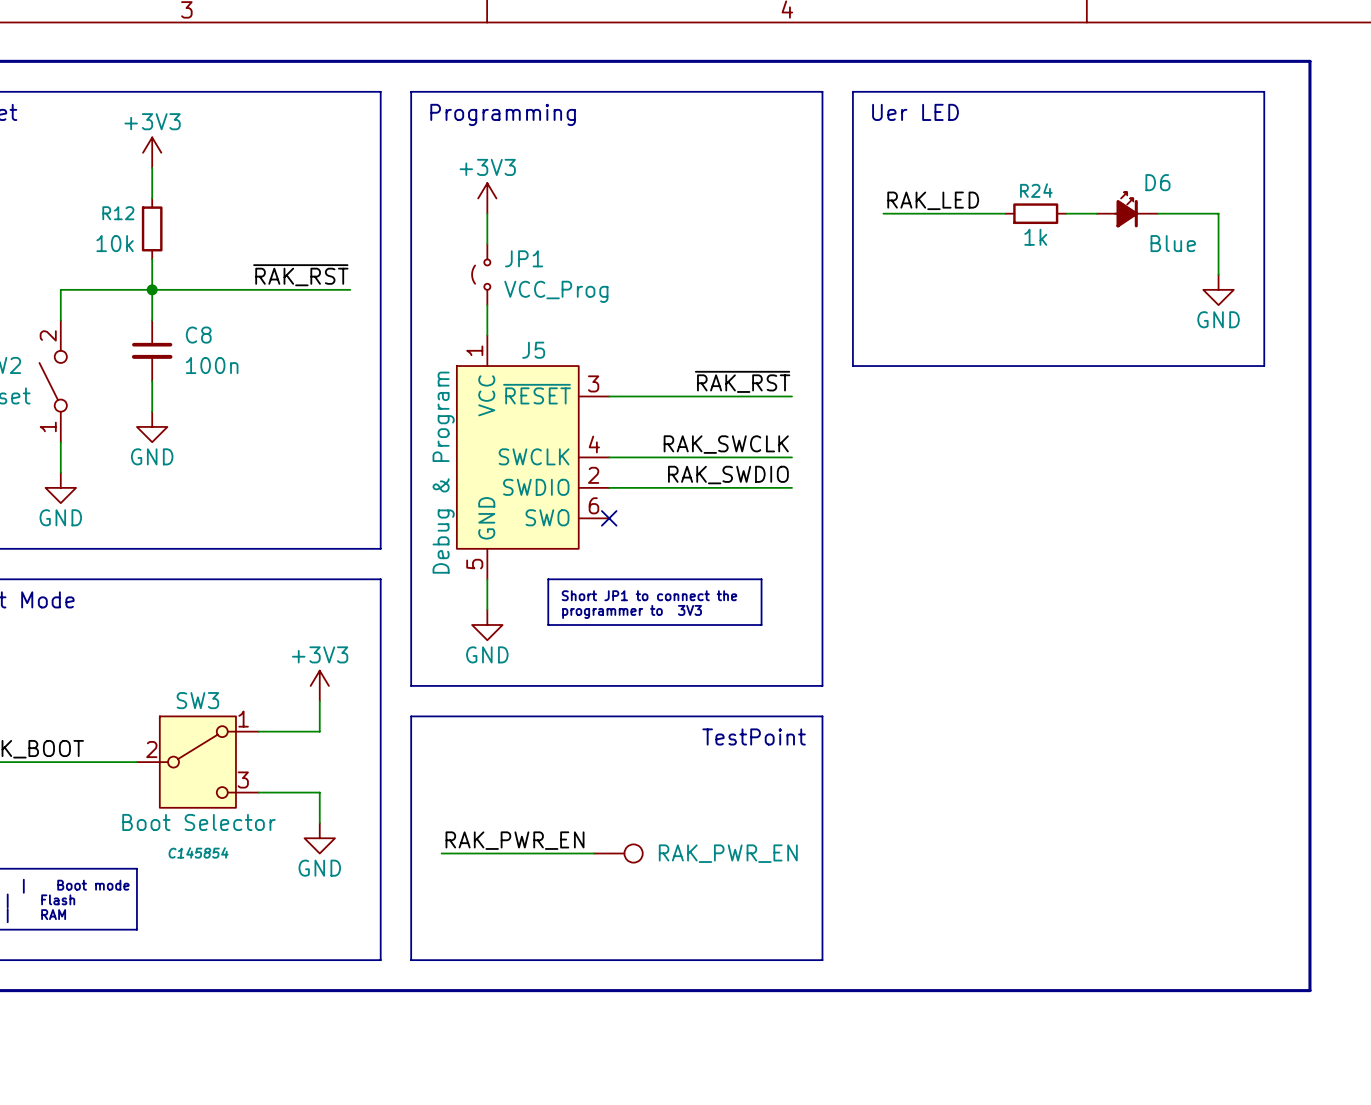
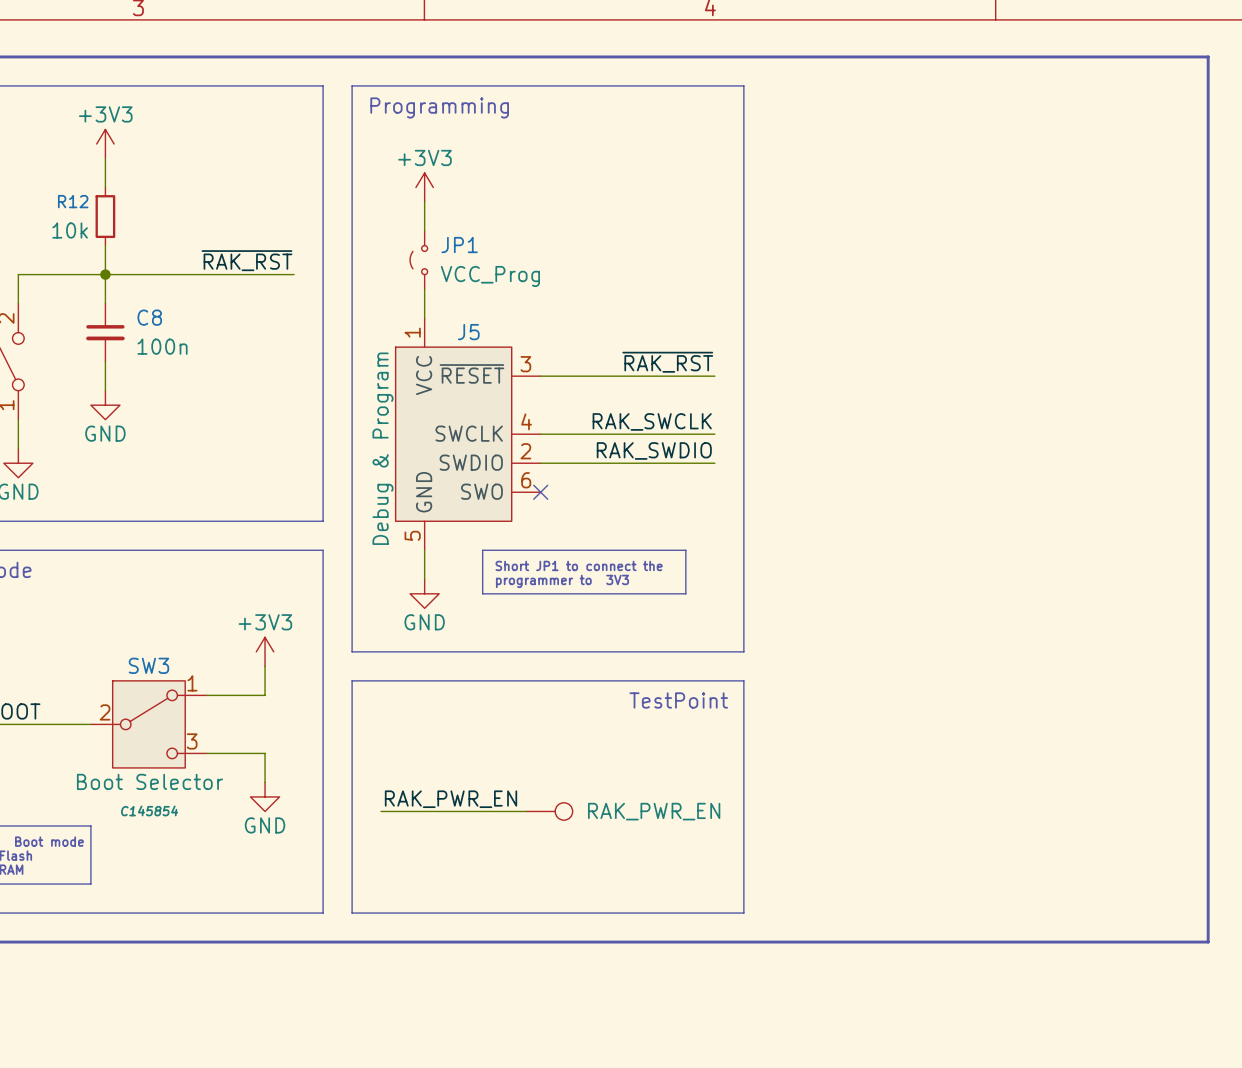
line: (852, 91) (1264, 91) (1264, 366) (852, 366) (852, 91) -> none
text: Uer LED (915, 112) -> none
label: RAK_LED (933, 200) -> none
D6: Blue (1127, 209) -> none
wire: (883, 213) (1005, 213) -> none
R24: 1k (1035, 213) -> none
wire: (1066, 213) (1096, 213) -> none
wire: (1157, 213) (1218, 213) (1218, 274) -> none
power symbol: GND (1218, 289) -> none

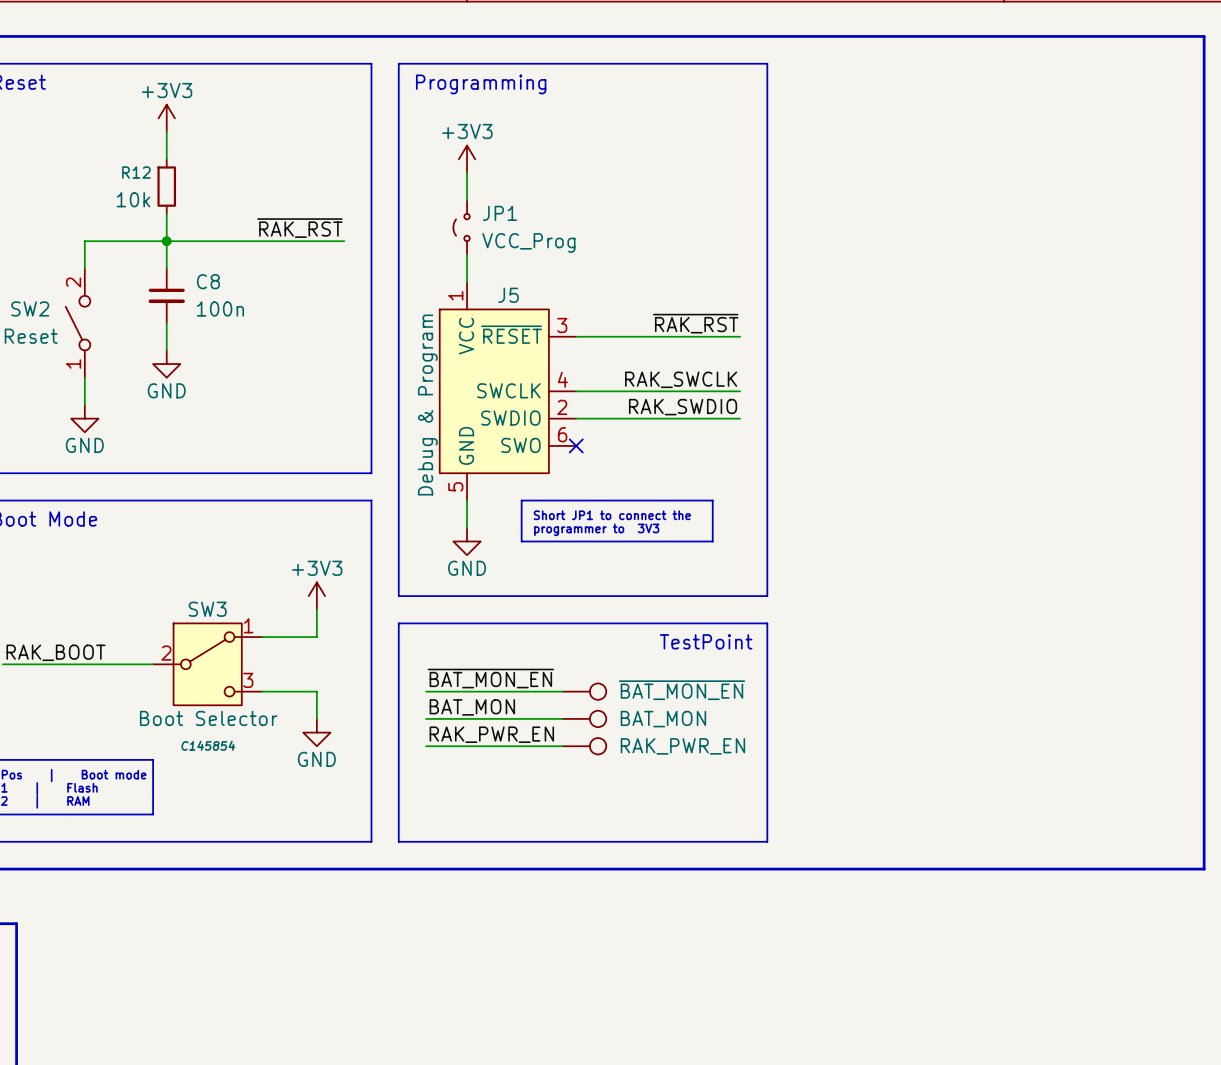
label: none -> ~{BAT_MON_EN} (490, 678)
wire: none -> (426, 691) (562, 691)
part: none -> ~{BAT_MON_EN} (584, 691)
label: none -> BAT_MON (472, 707)
wire: none -> (426, 718) (562, 718)
part: none -> BAT_MON (584, 718)

